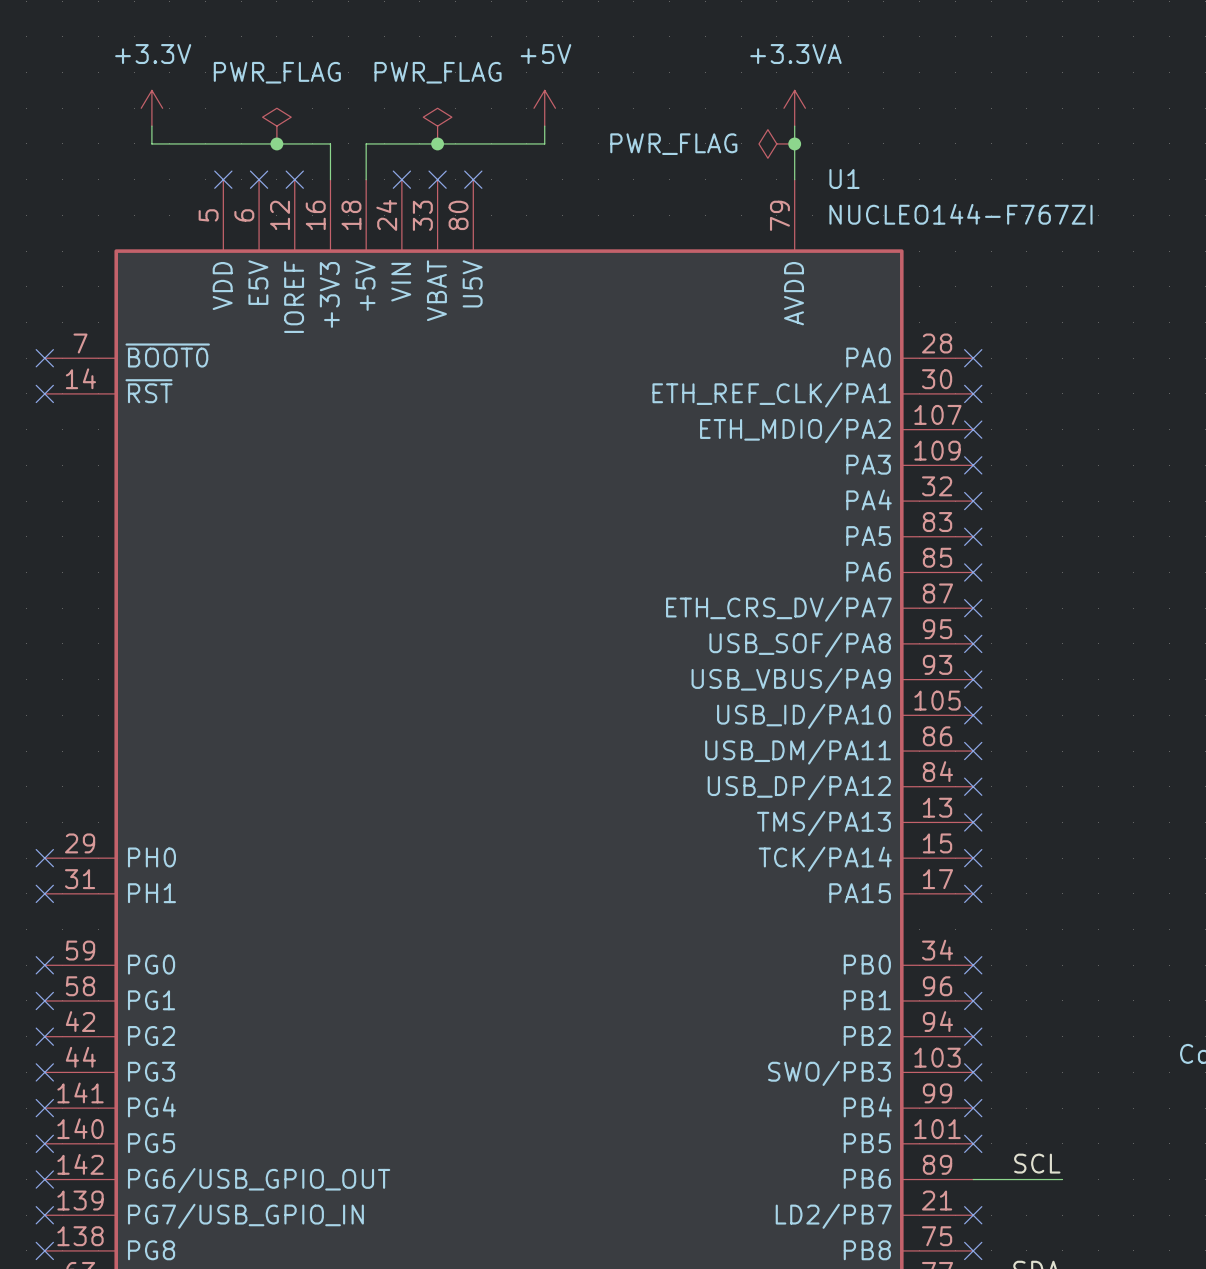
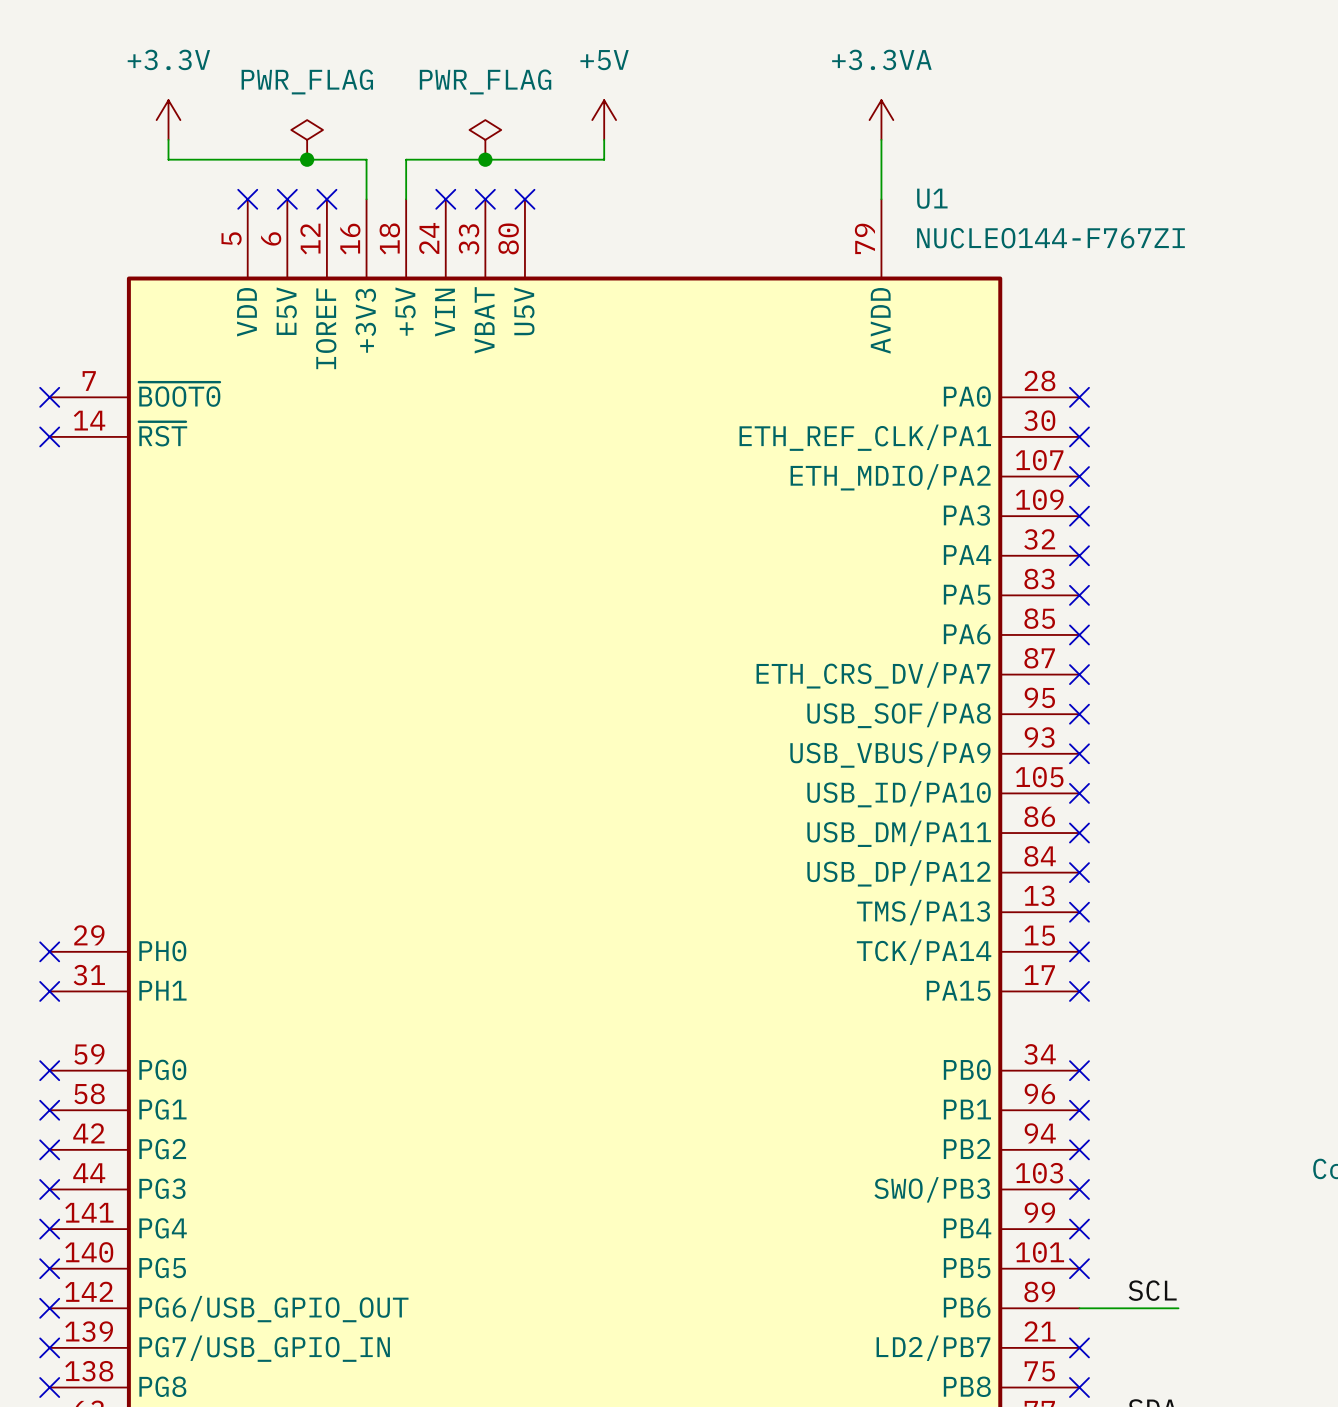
power symbol: PWR_FLAG (776, 143) -> none
junction: (794, 143) -> none

